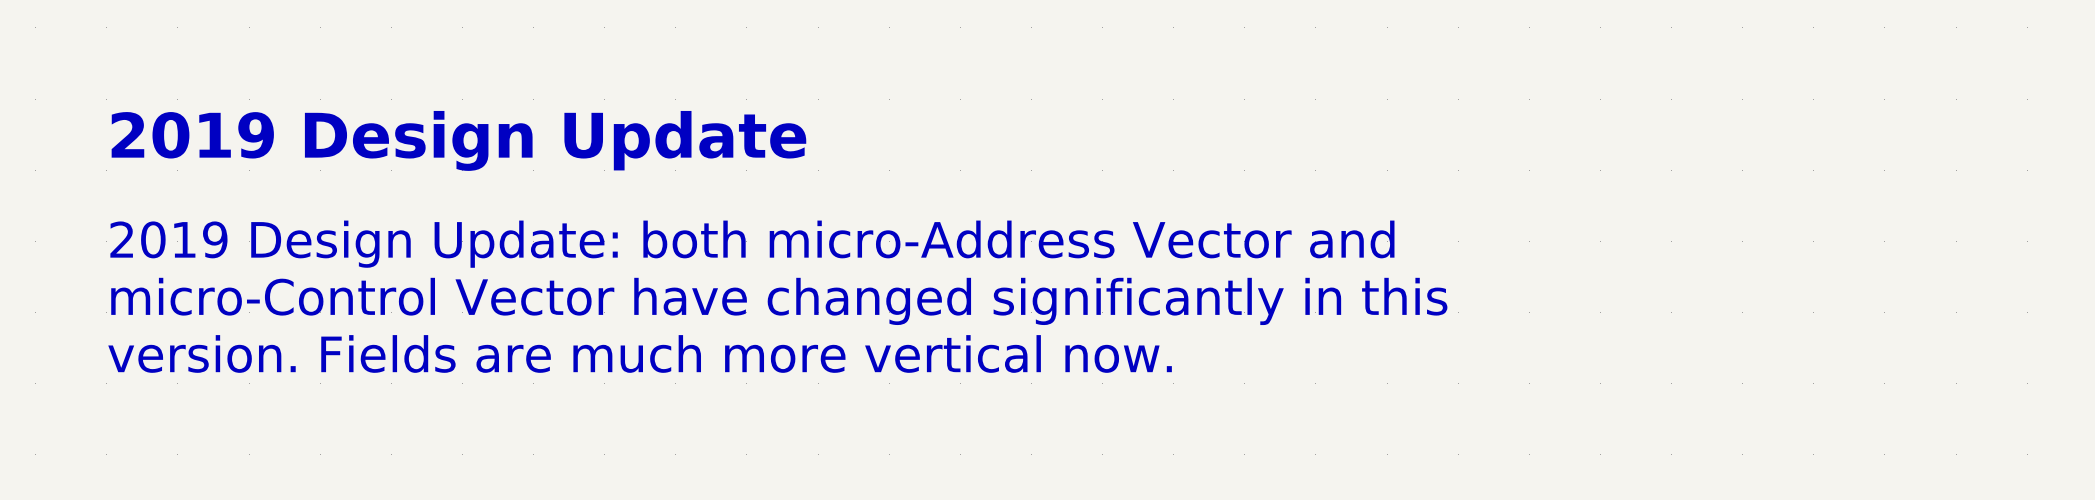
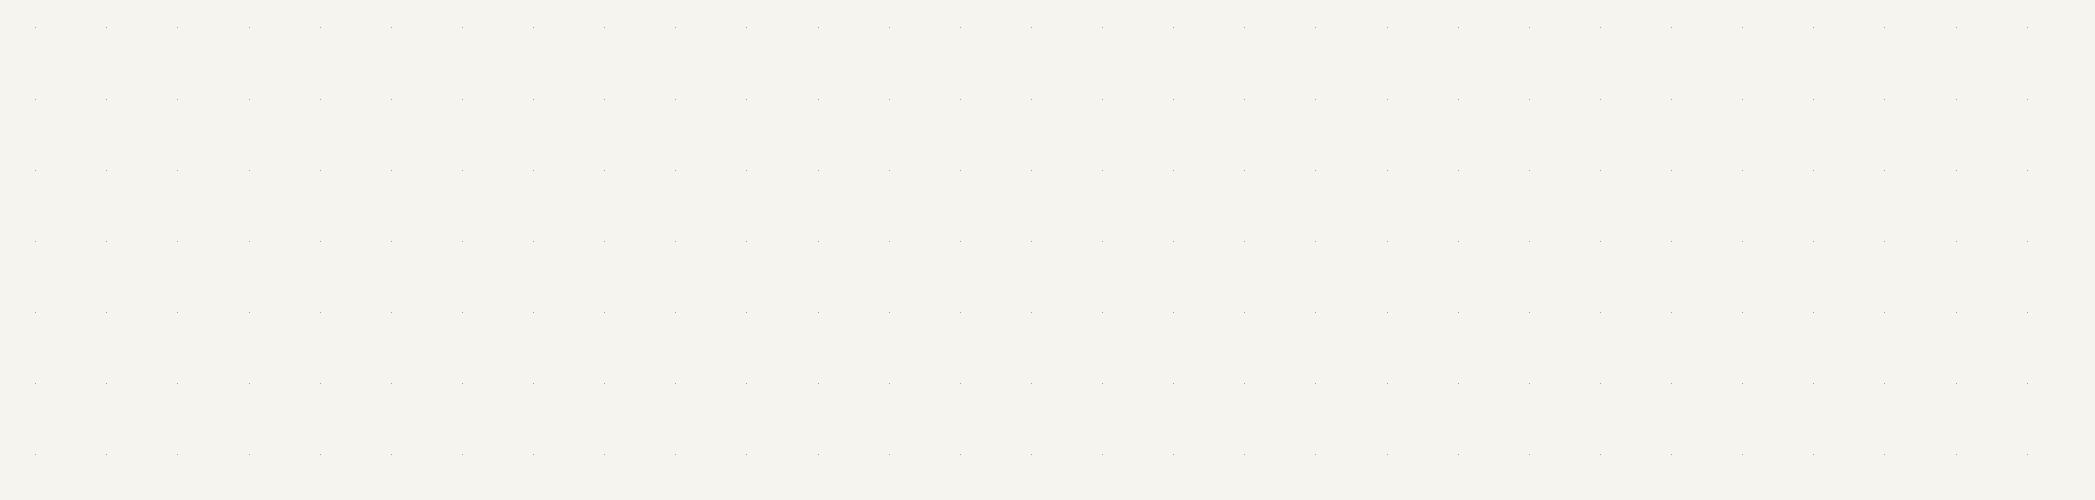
text: 2019 Design Update (458, 140) -> none
text: 2019 Design Update: both micro-Address Vector and (752, 244) -> none
text: micro-Control Vector have changed significantly in this (779, 301) -> none
text: version. Fields are much more vertical now. (640, 353) -> none

